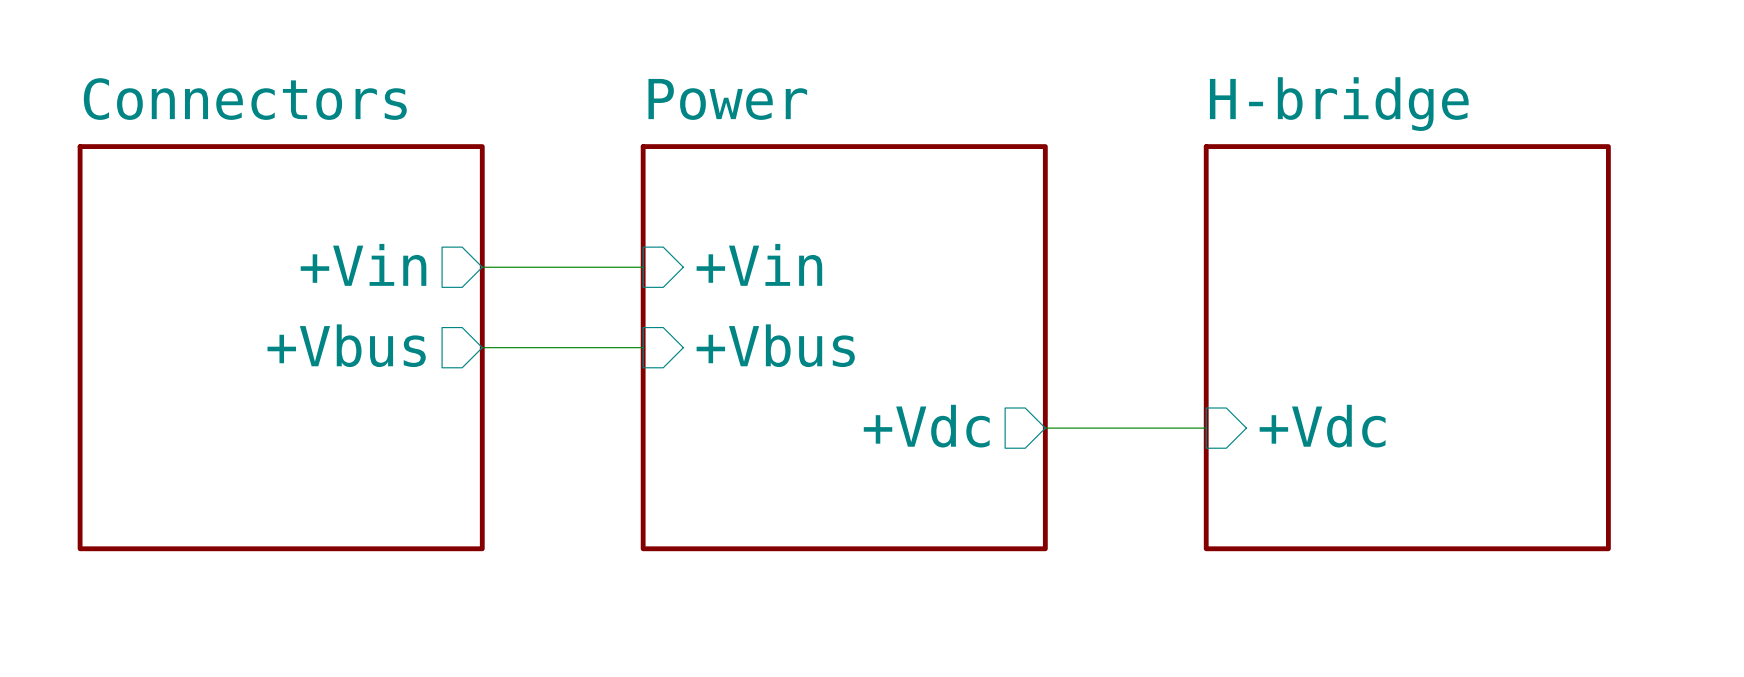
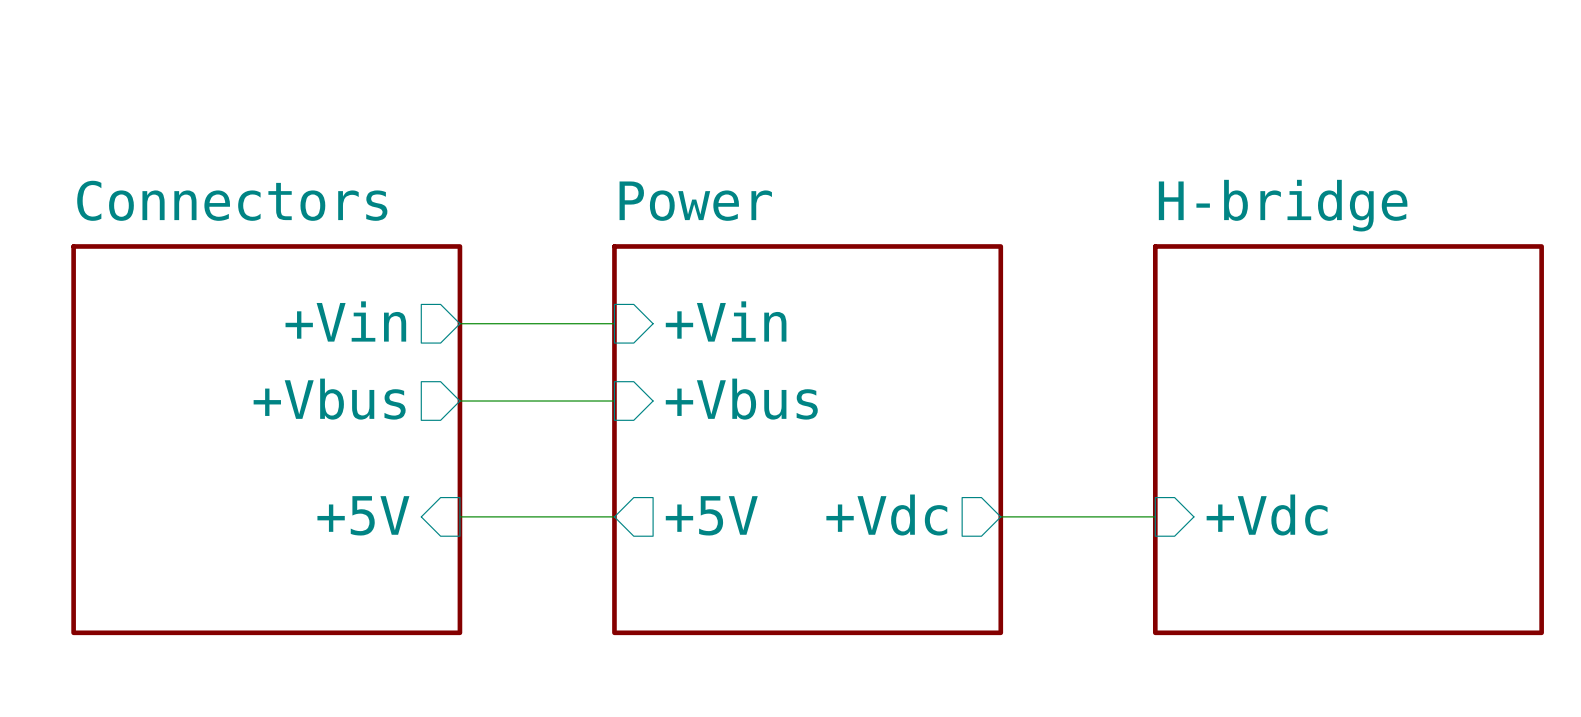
sheet pin position: +Vin (363, 264) -> +Vin (345, 321)
sheet pin position: +Vin (759, 264) -> +Vin (726, 321)
wire: (482, 267) (643, 267) -> (459, 323) (614, 323)
sheet pin position: +Vbus (346, 345) -> +Vbus (329, 399)
sheet pin position: +Vbus (775, 345) -> +Vbus (741, 399)
wire: (482, 347) (643, 347) -> (459, 401) (614, 401)
sheet pin: none -> +5V (363, 515)
sheet pin: none -> +5V (711, 515)
wire: none -> (459, 516) (614, 516)

